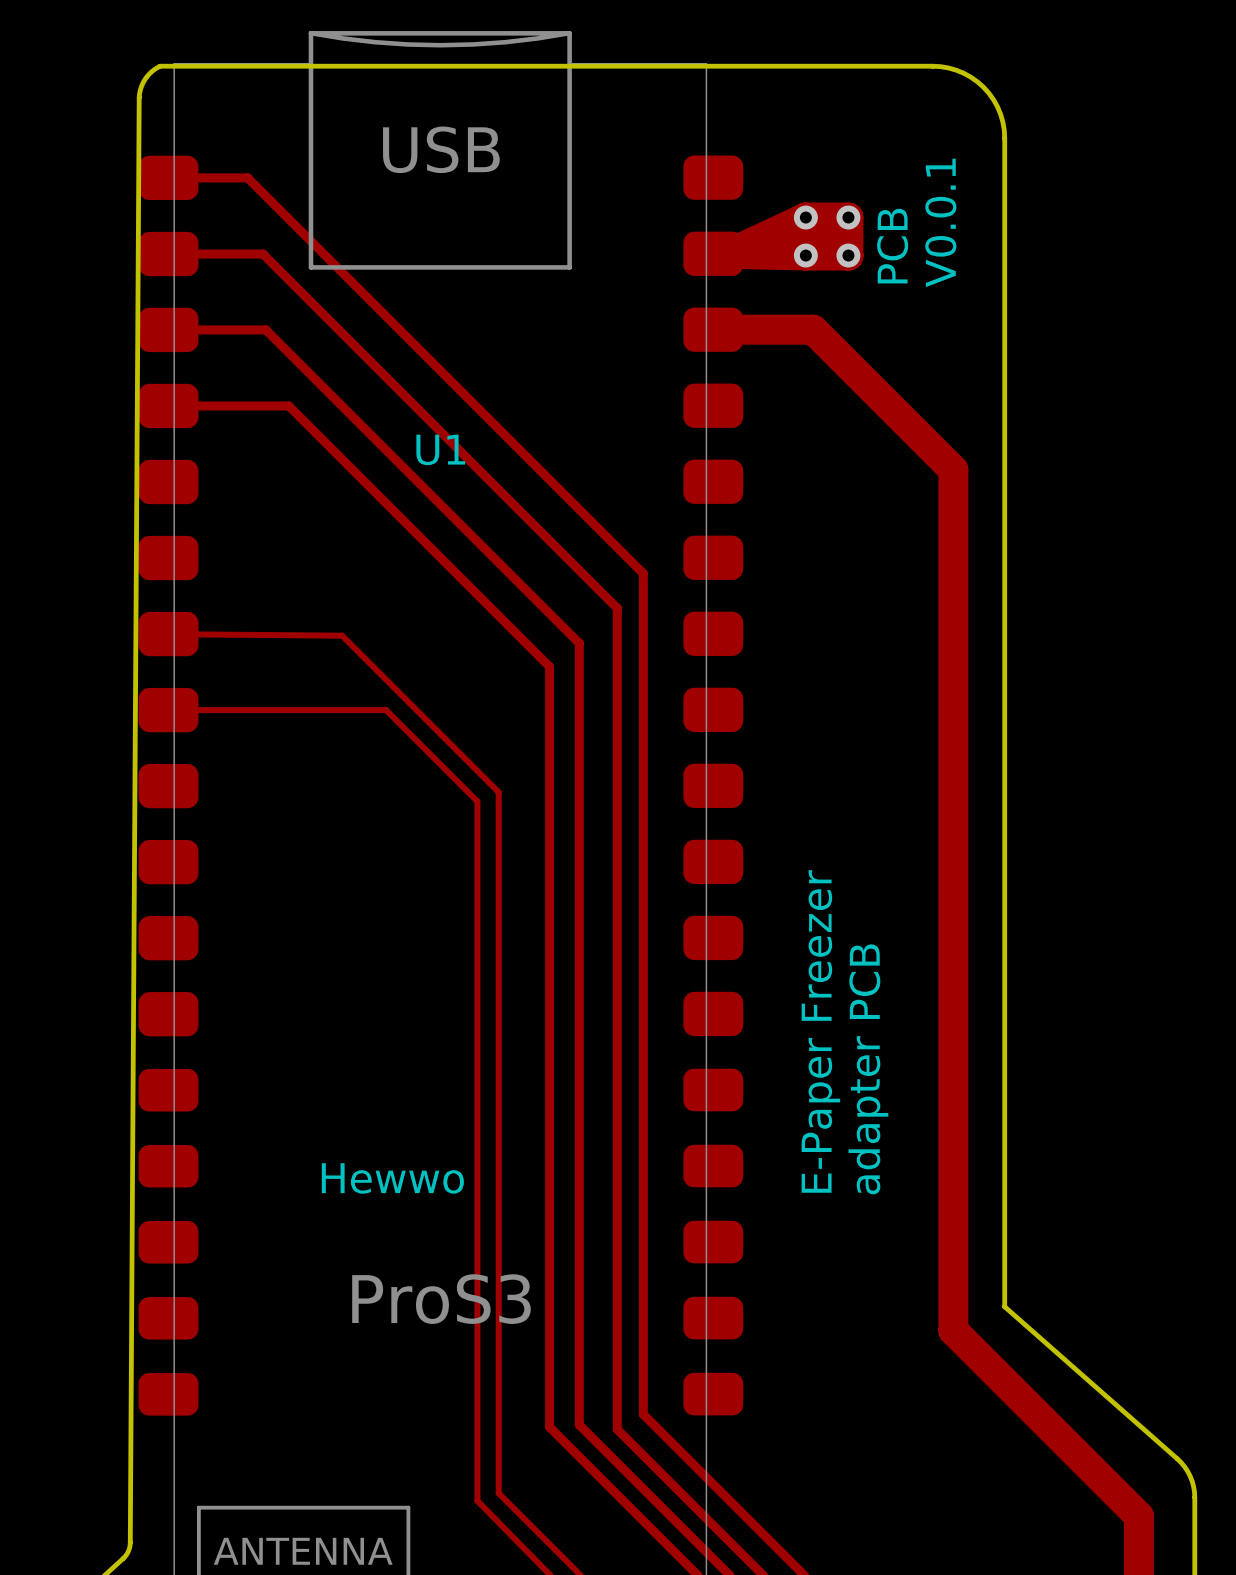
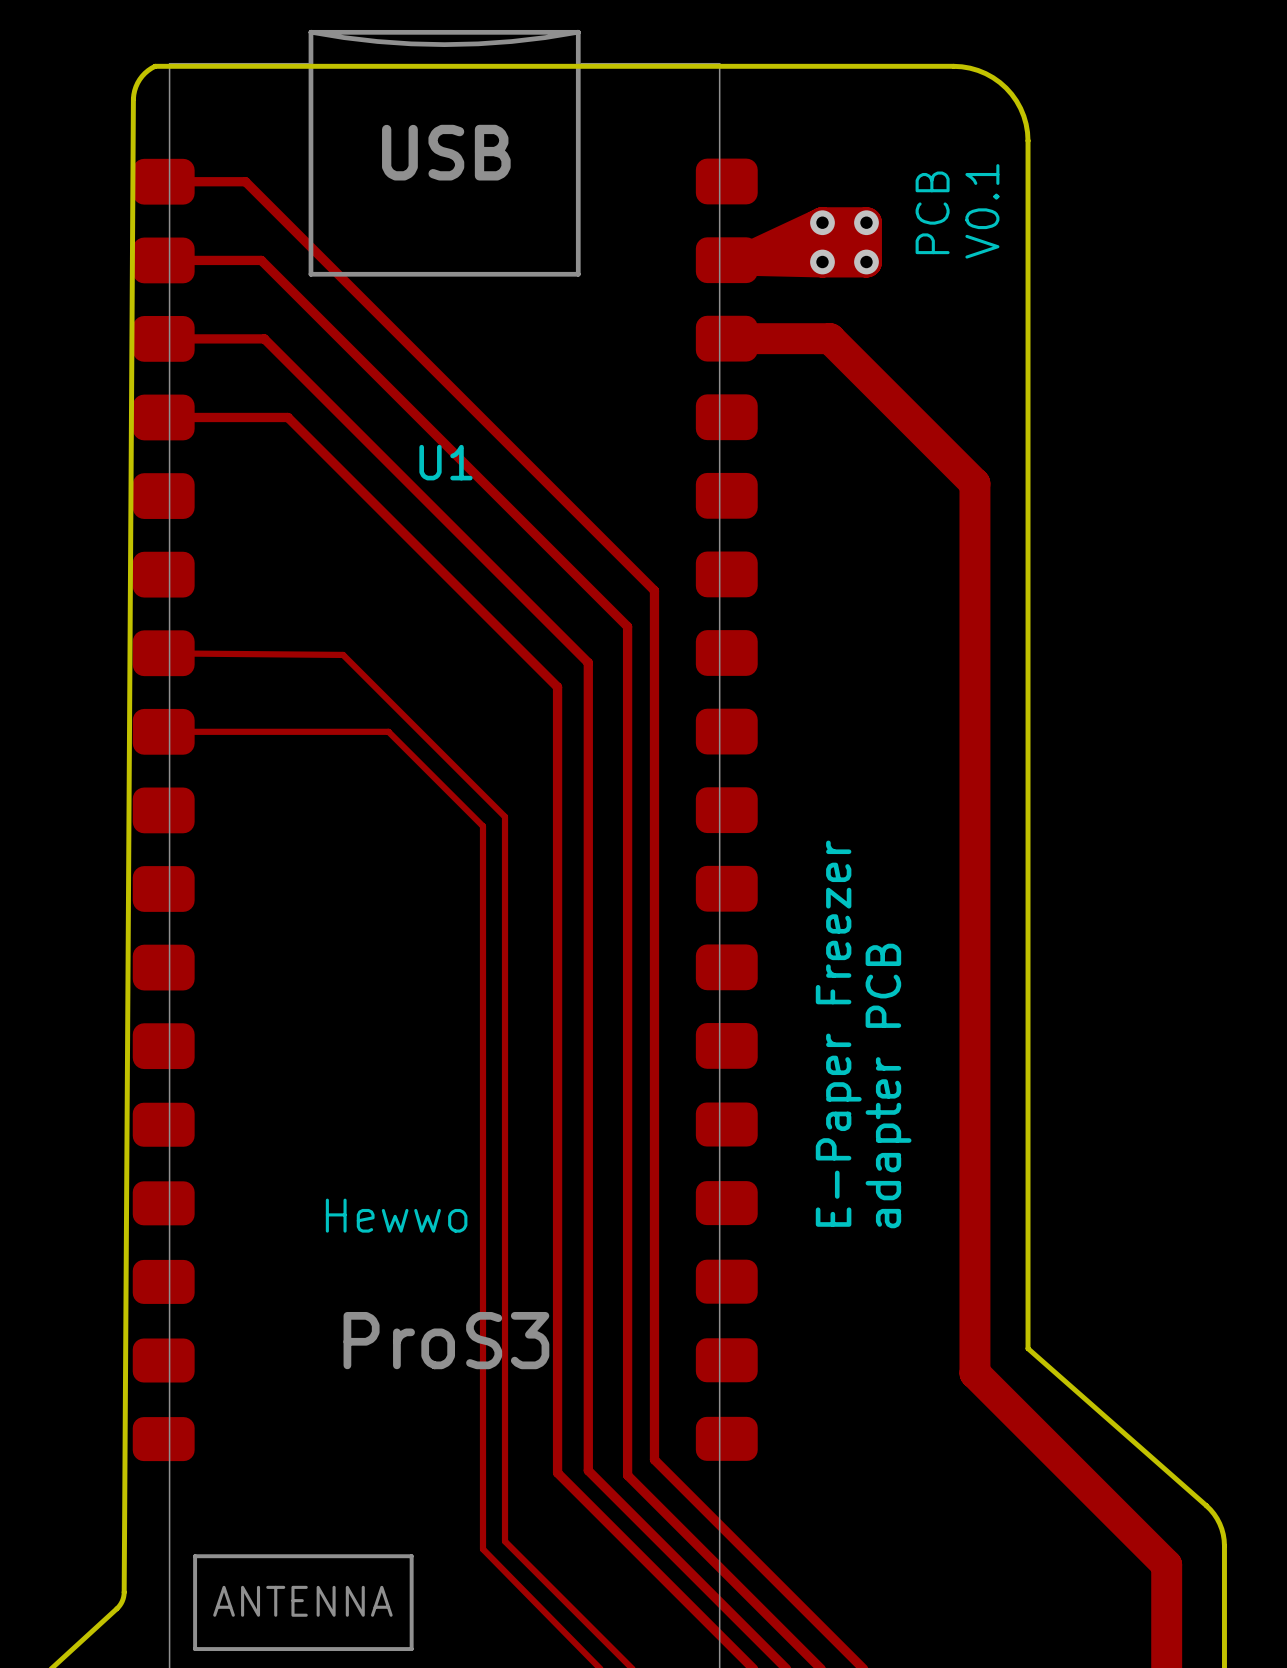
text: V0.0.1 (940, 222) -> V0.1 (982, 211)
text position: PCB (892, 246) -> PCB (932, 212)

